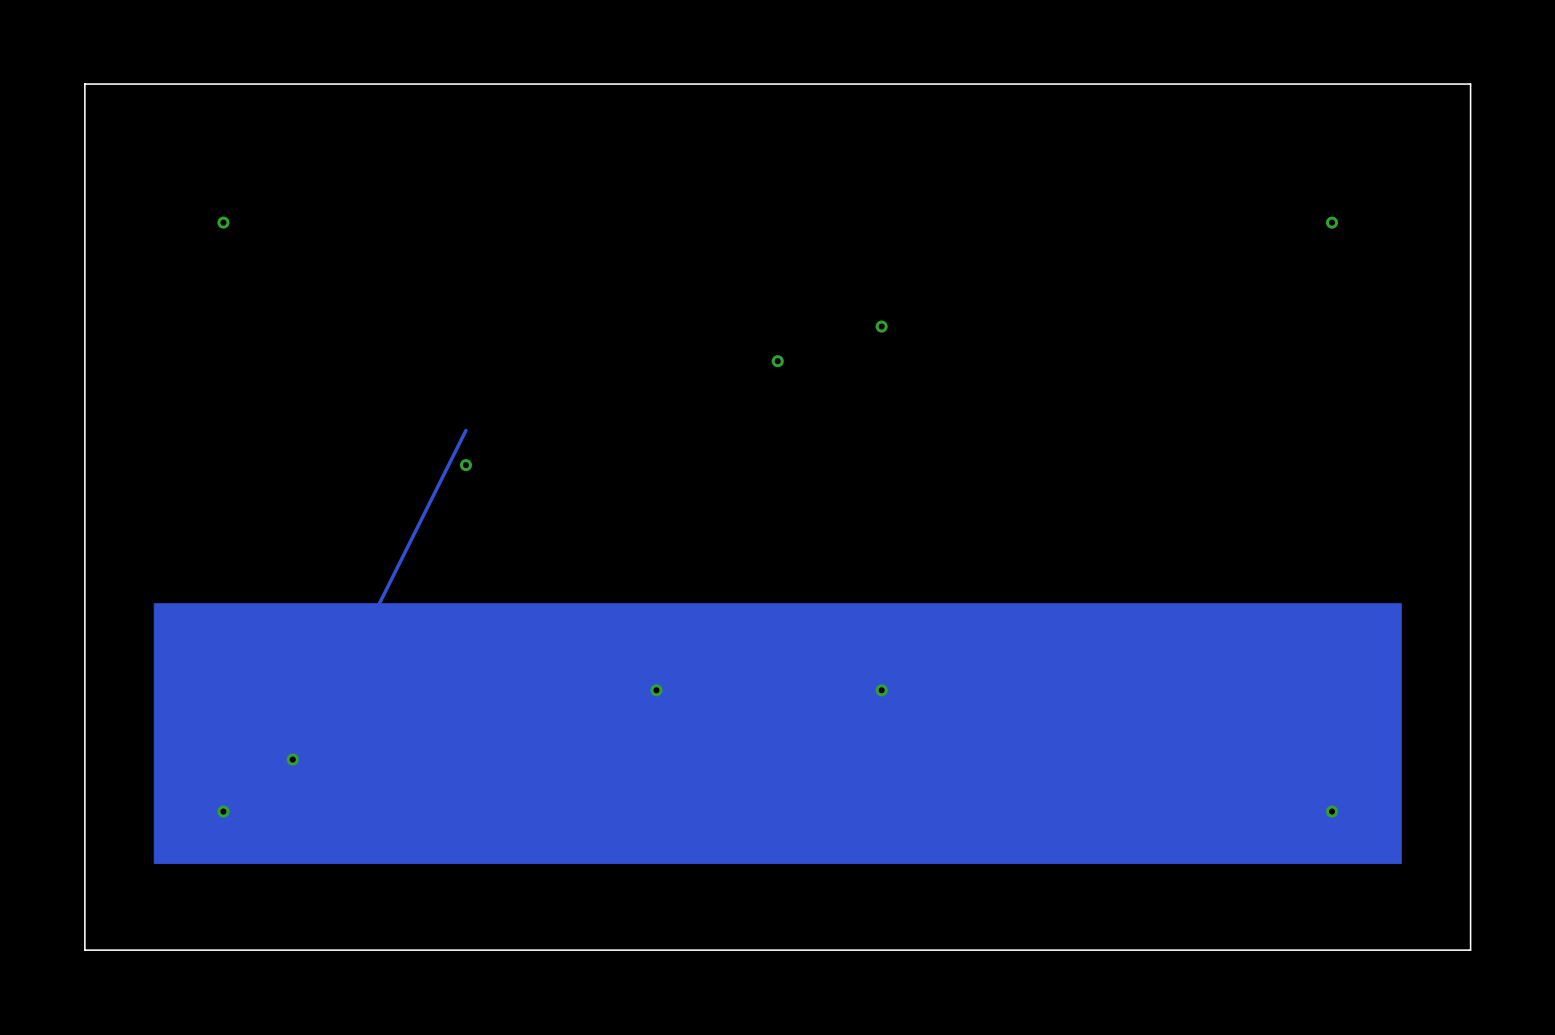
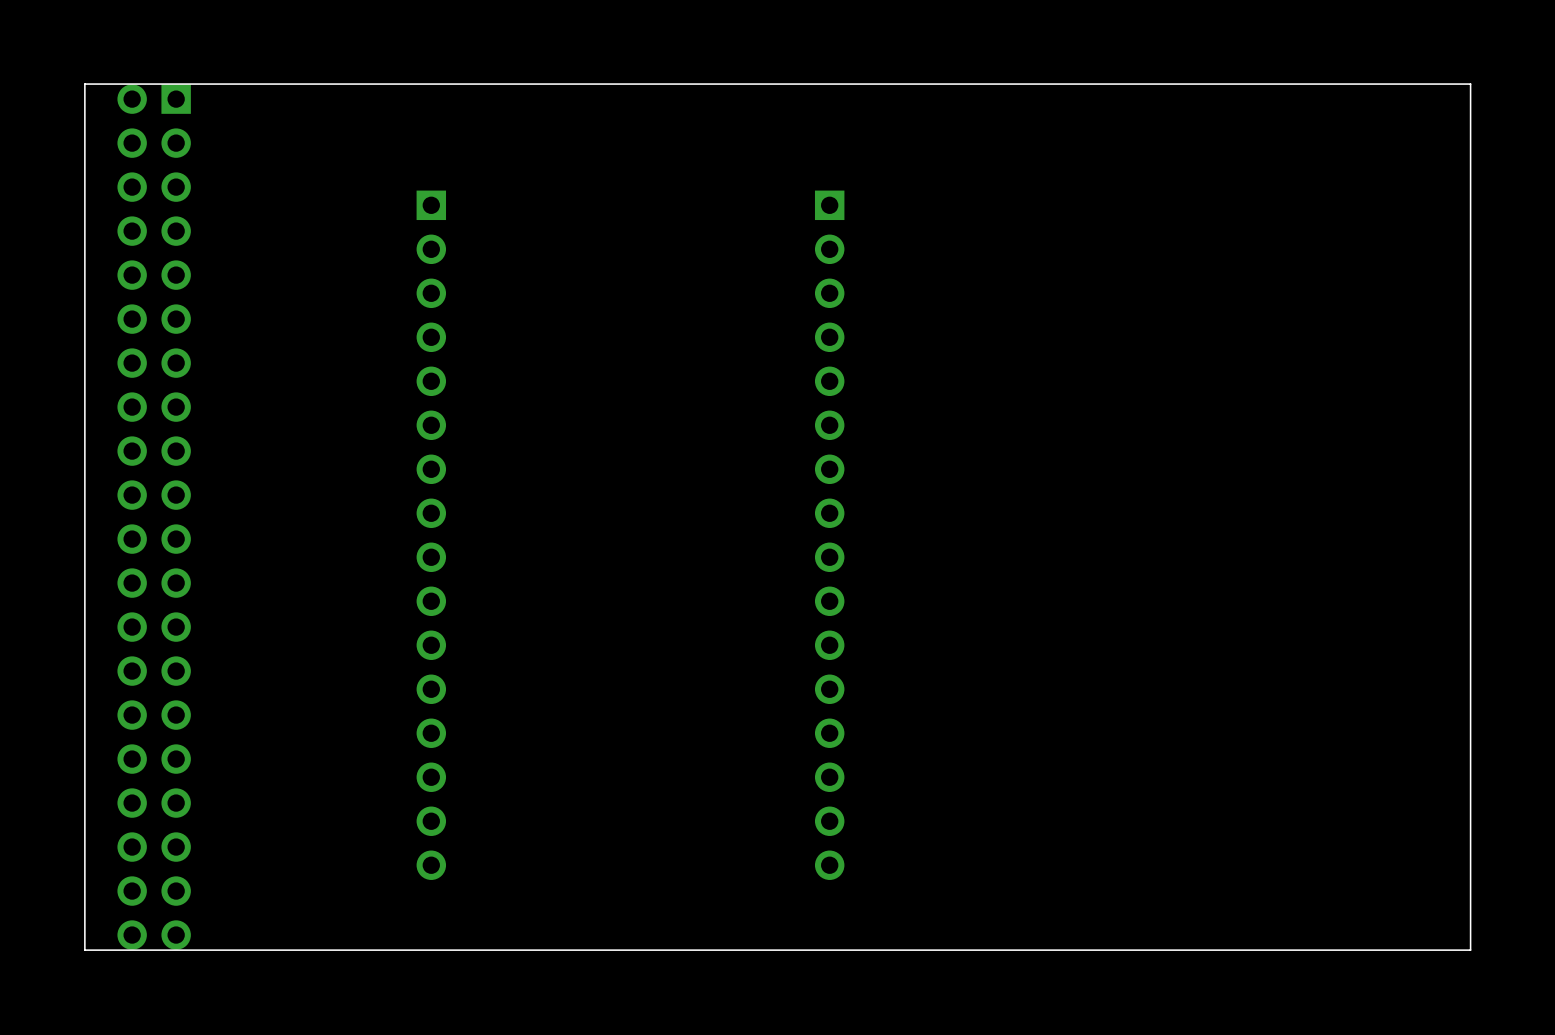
via: (223, 222) -> none
via: (1332, 222) -> none
via: (881, 326) -> none
via: (777, 361) -> none
track: (465, 430) (292, 776) -> none
via: (465, 465) -> none
part: none -> (154, 517)
part: none -> (431, 535)
part: none -> (829, 535)
drawing: [153, 603, 1402, 864] -> none
via: (656, 690) -> none
via: (881, 690) -> none
via: (292, 759) -> none
via: (223, 811) -> none
via: (1332, 811) -> none

